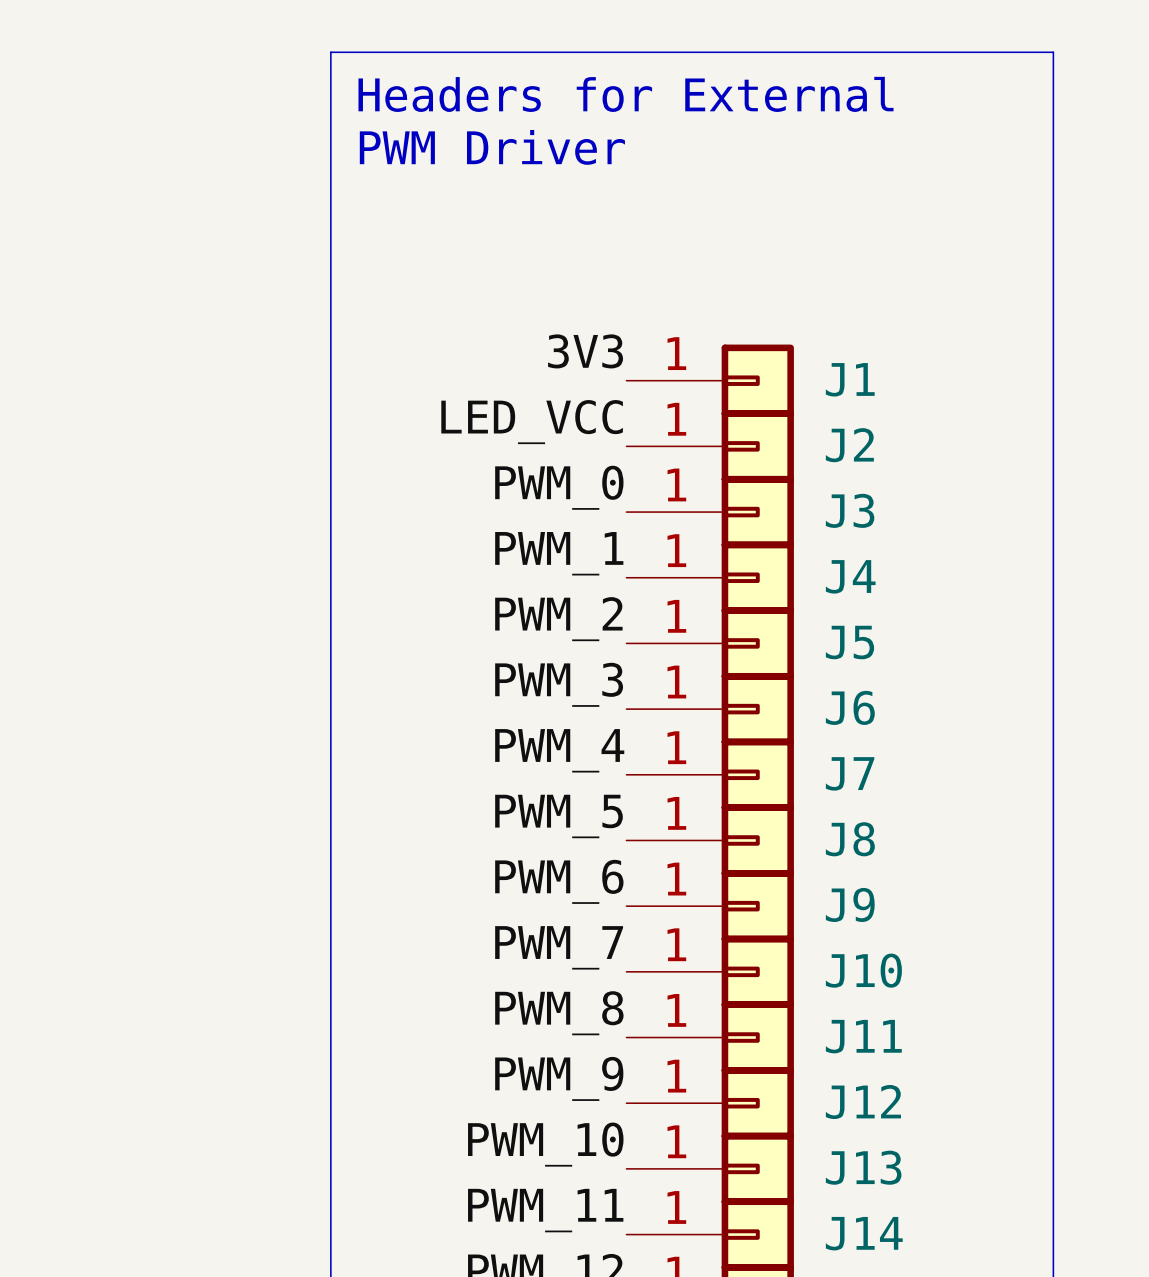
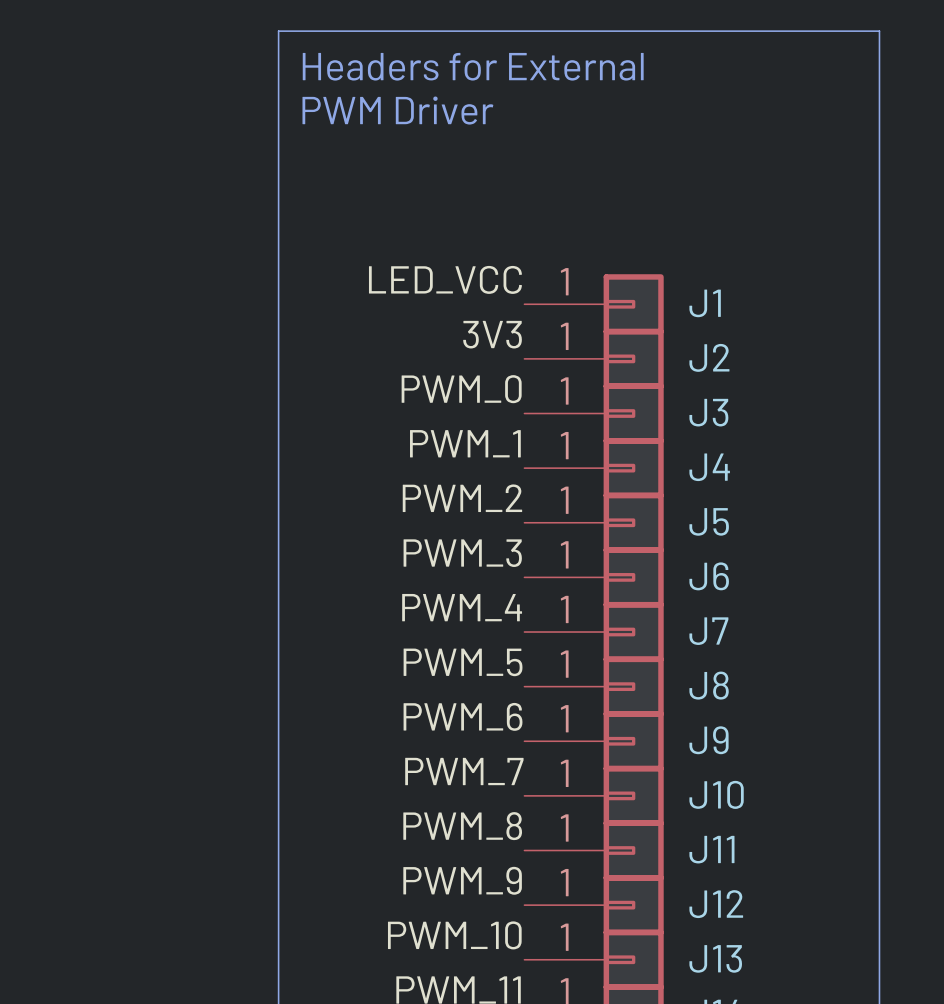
label: 3V3 (585, 351) -> LED_VCC (445, 279)
label: LED_VCC (532, 422) -> 3V3 (492, 334)

